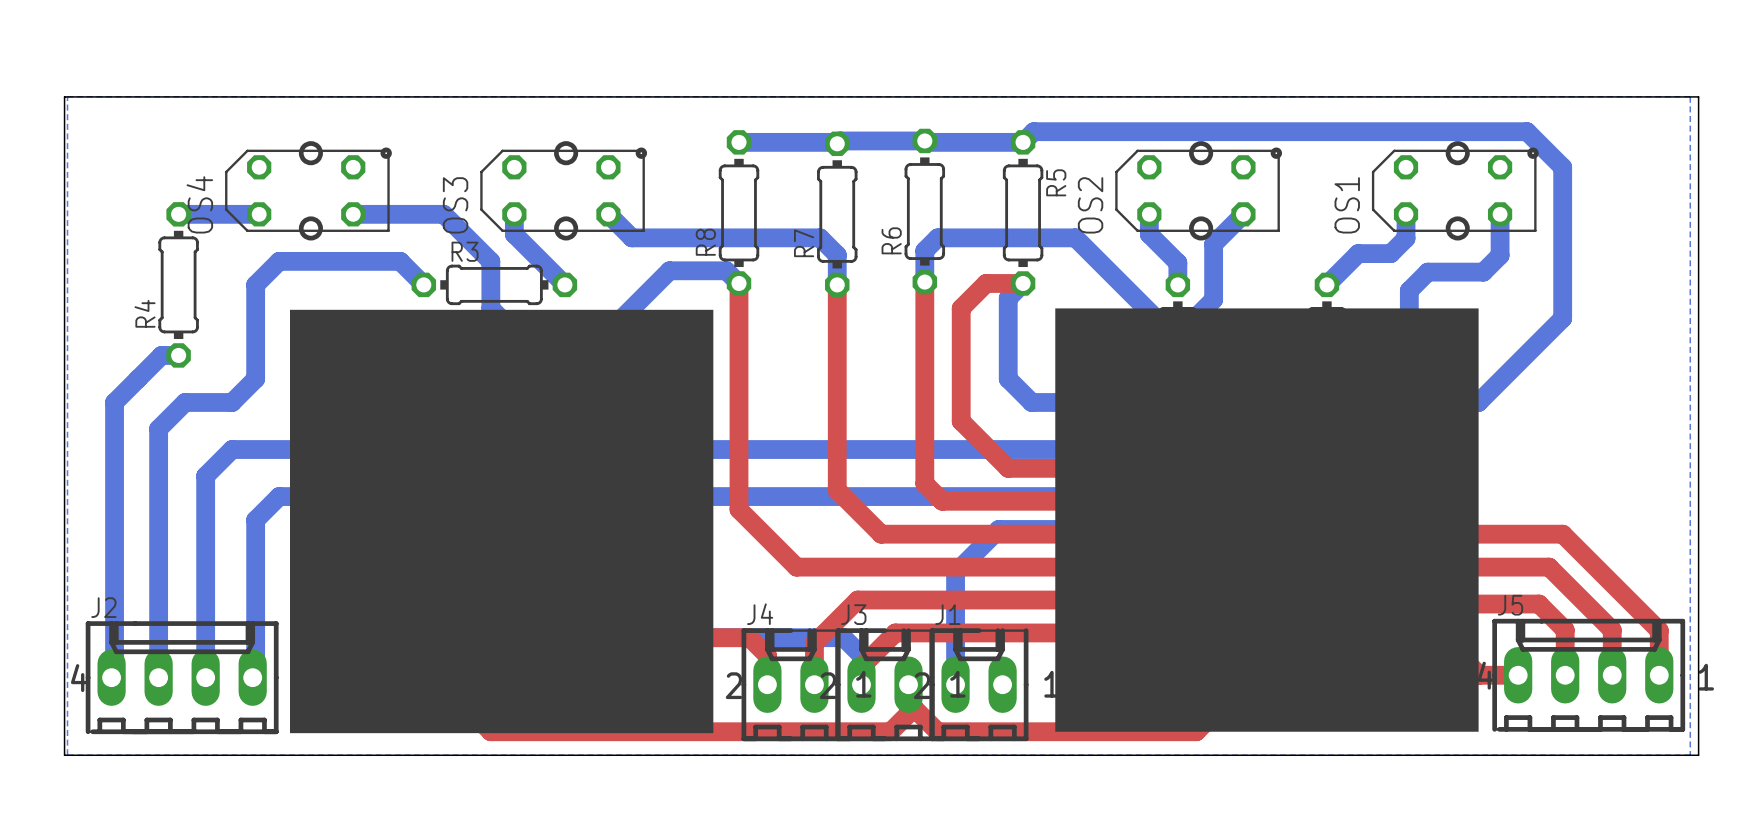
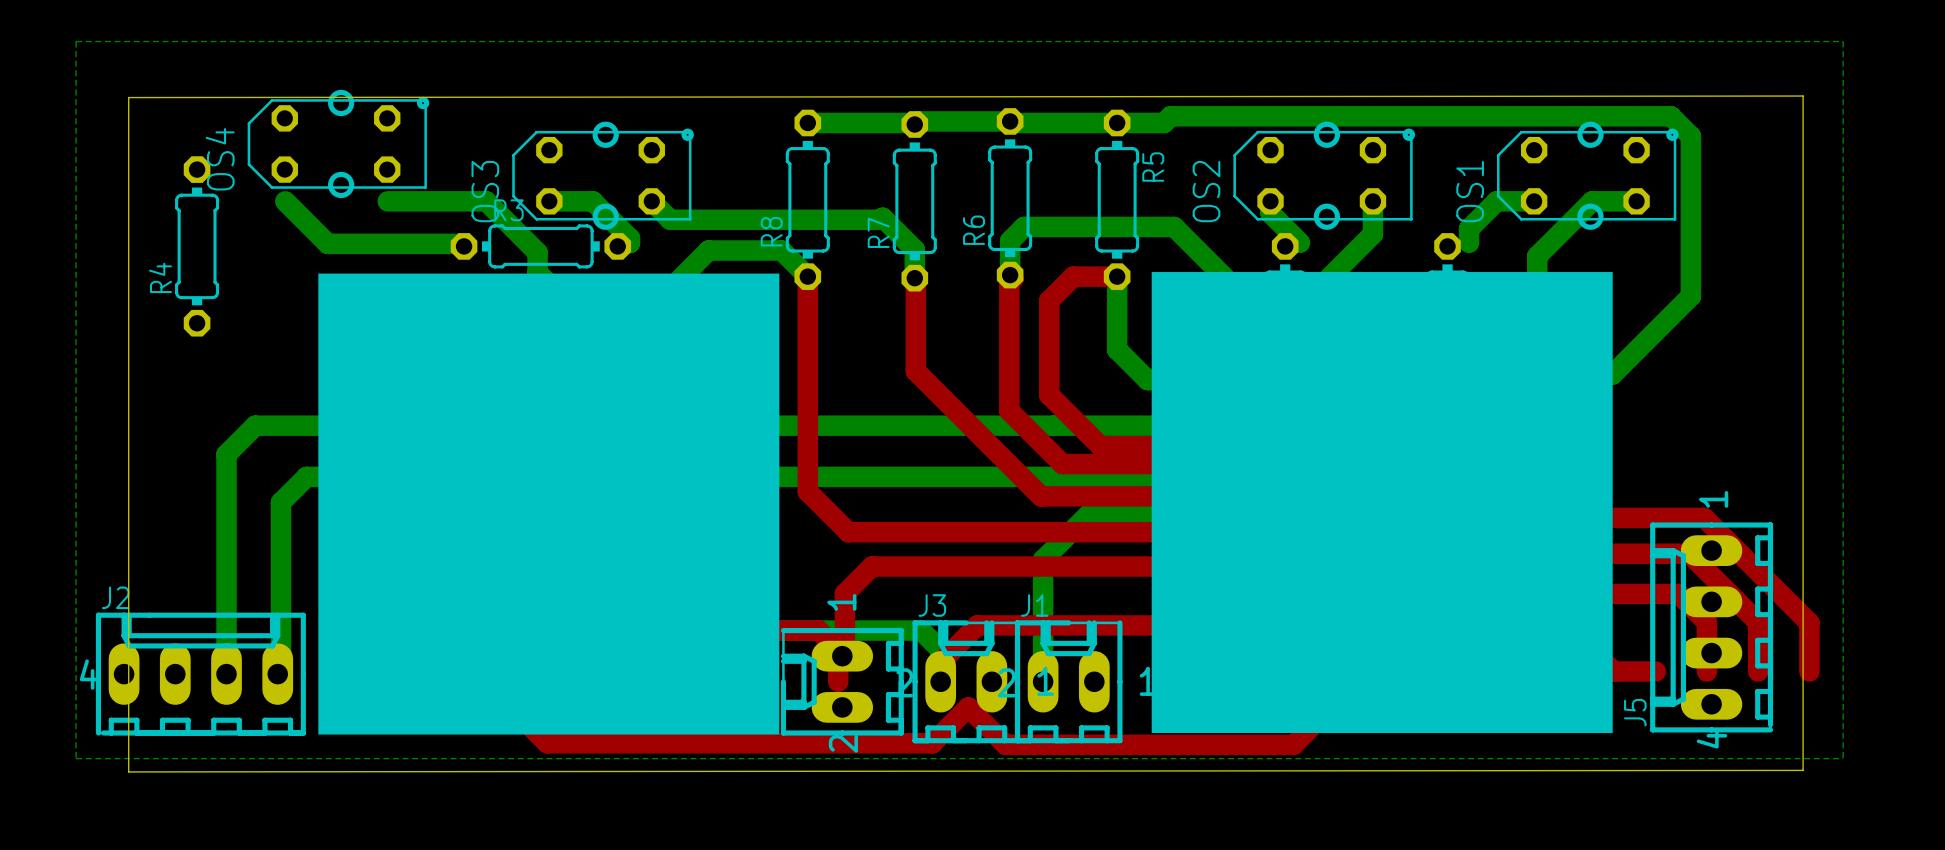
board edge: (64, 96) (1698, 96) (1698, 755) (64, 755) (64, 96) -> (1803, 96) (128, 97) (128, 771) (1803, 770) (1803, 96)
bottom track: (739, 142) (1023, 142) (1033, 131) (1527, 131) (1562, 167) (1562, 318) (1550, 330) -> (807, 122) (913, 122) (914, 124) (917, 121) (1163, 122) (1170, 116) (1670, 116) (1690, 136) (1690, 296)
OS3 position: (563, 190) -> (603, 175)
OS2 position: (1198, 190) -> (1324, 175)
OS1 position: (1455, 190) -> (1587, 175)
R6 position: (924, 211) -> (1010, 198)
R8 position: (739, 212) -> (807, 199)
R5 position: (1023, 212) -> (1117, 199)
bottom track: (178, 214) (259, 214) -> none
bottom track: (353, 214) (443, 214) (490, 261) (491, 308) -> (387, 201) (486, 201) (537, 252) (537, 272)
bottom track: (514, 214) (514, 234) (564, 284) -> none
bottom track: (608, 214) (631, 237) (820, 237) (837, 255) (837, 284) -> none
R7 position: (837, 214) -> (914, 201)
bottom track: (1149, 214) (1149, 234) (1177, 262) (1177, 284) -> none
bottom track: (1243, 214) (1213, 244) (1213, 299) (1192, 320) -> (1372, 201) (1372, 234) (1321, 285) (1301, 285)
bottom track: (1406, 214) (1406, 238) (1390, 253) (1358, 253) (1326, 284) -> none
bottom track: (1500, 214) (1500, 255) (1483, 272) (1427, 272) (1409, 290) (1409, 293) -> (1636, 201) (1592, 201) (1537, 256)
bottom track: none -> (285, 201) (327, 243) (458, 243)
bottom track: none -> (549, 201) (592, 201) (630, 238) (629, 243)
bottom track: none -> (651, 201) (670, 219) (880, 219) (882, 217) (914, 249) (914, 278)
bottom track: none -> (1270, 201) (1270, 213) (1300, 242)
bottom track: none -> (1534, 201) (1496, 201) (1469, 229) (1469, 242)
bottom track: (924, 282) (924, 250) (937, 237) (1075, 237) (1158, 320) -> (1010, 275) (1010, 240) (1024, 226) (1174, 226) (1232, 285) (1263, 285)
top track: (924, 282) (924, 483) (942, 501) (1293, 501) -> (1013, 278) (1009, 275) (1009, 410) (1062, 464) (1393, 464) (1411, 482)
bottom track: (739, 283) (726, 270) (669, 270) (608, 331) (514, 331) -> (807, 276) (781, 250) (708, 250) (654, 304) (569, 304) (562, 297)
top track: (739, 283) (739, 510) -> (807, 276) (807, 491)
bottom track: (1023, 283) (1008, 298) (1008, 378) (1031, 402) (1125, 402) -> (1117, 276) (1117, 349) (1147, 380) (1222, 380) (1228, 374)
top track: (1023, 283) (986, 283) (961, 308) (961, 334) -> (1117, 276) (1073, 276) (1049, 300)
bottom track: (423, 284) (400, 261) (279, 261) (255, 284) (255, 378) (232, 402) (185, 402) (158, 428) (158, 677) (161, 674) -> none
top track: (837, 284) (837, 490) (881, 534) (1280, 534) -> (914, 278) (915, 371) (1041, 496) (1375, 496) (1396, 517)
bottom track: (178, 355) (161, 355) (114, 402) (114, 674) (111, 677) -> none
top track: (776, 547) (796, 567) (1266, 567) -> (848, 532) (1360, 532) (1381, 553)
top track: (1252, 600) (857, 600) (814, 643) (814, 684) -> (1366, 589) (1343, 566) (872, 566) (844, 593) (844, 653) (842, 656) (845, 656)
J5 rotation: 0° (1588, 675) -> 90° counterclockwise (1711, 627)
J4 rotation: 0° (790, 684) -> 90° counterclockwise (842, 681)
top track: (490, 731) (890, 731) (914, 708) (937, 731) (1196, 731) -> (537, 733) (547, 743) (932, 743) (968, 707) (1005, 744) (1293, 744) (1305, 733)

